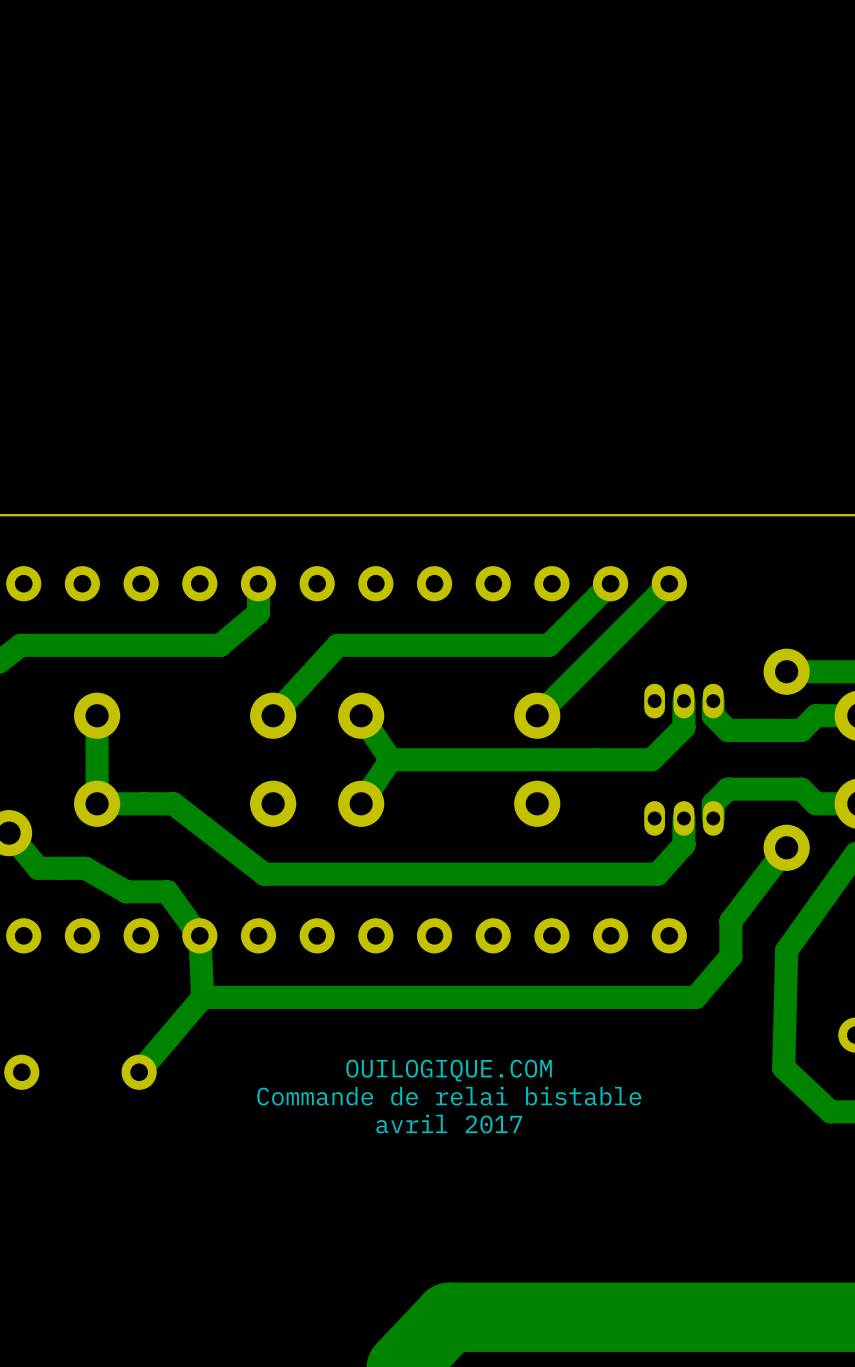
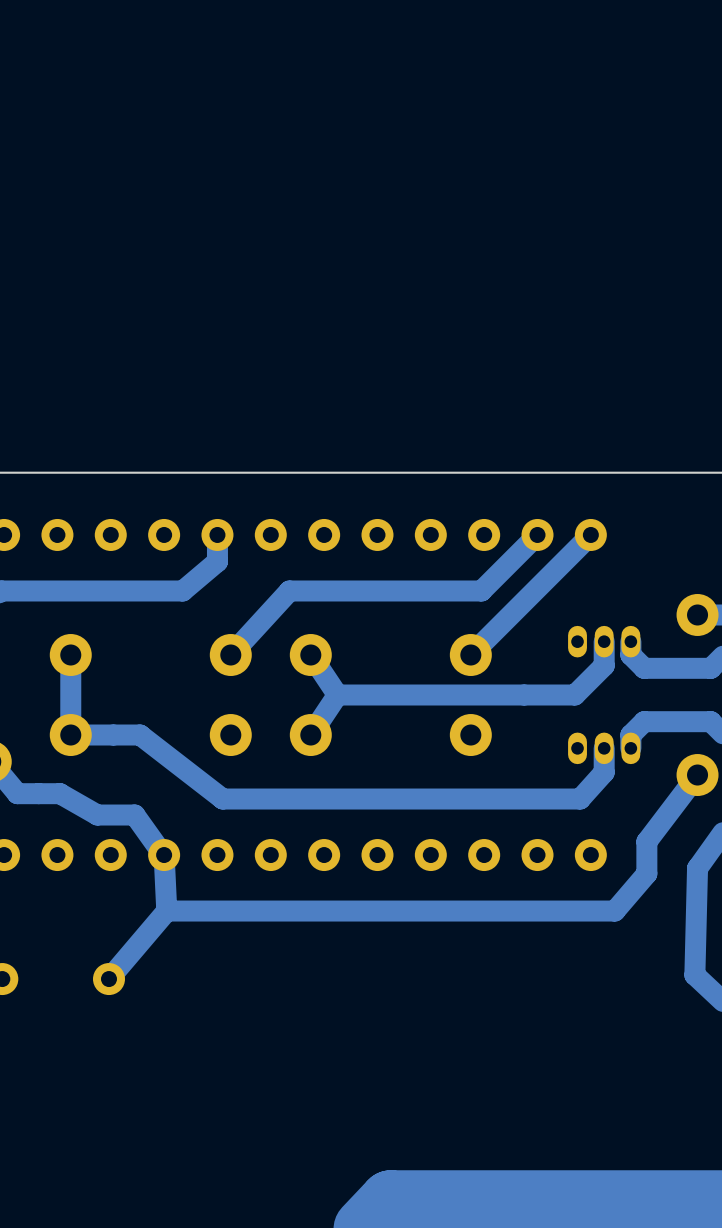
text: OUILOGIQUE.COM (449, 1070) -> none
text: Commande de relai bistable (449, 1096) -> none
text: avril 2017 (449, 1123) -> none

